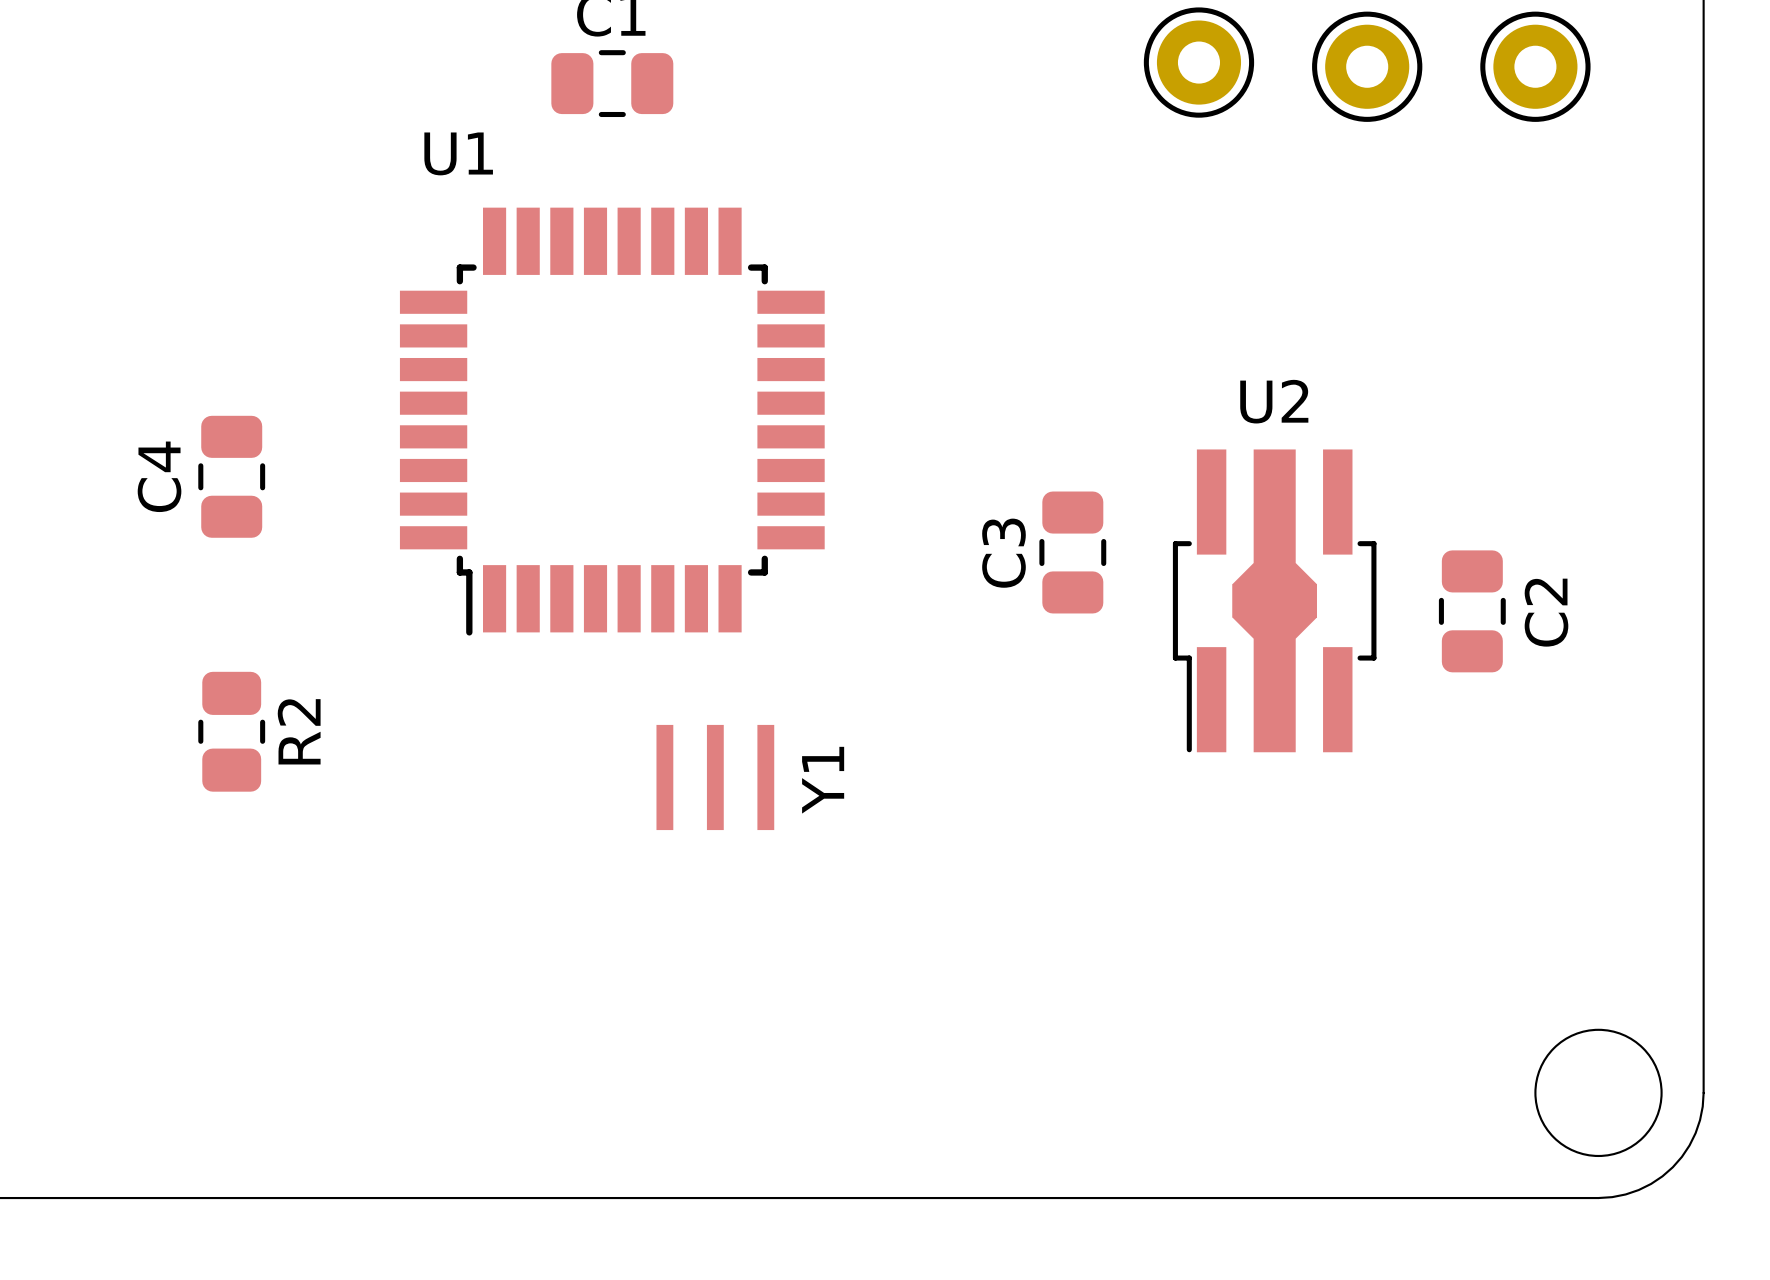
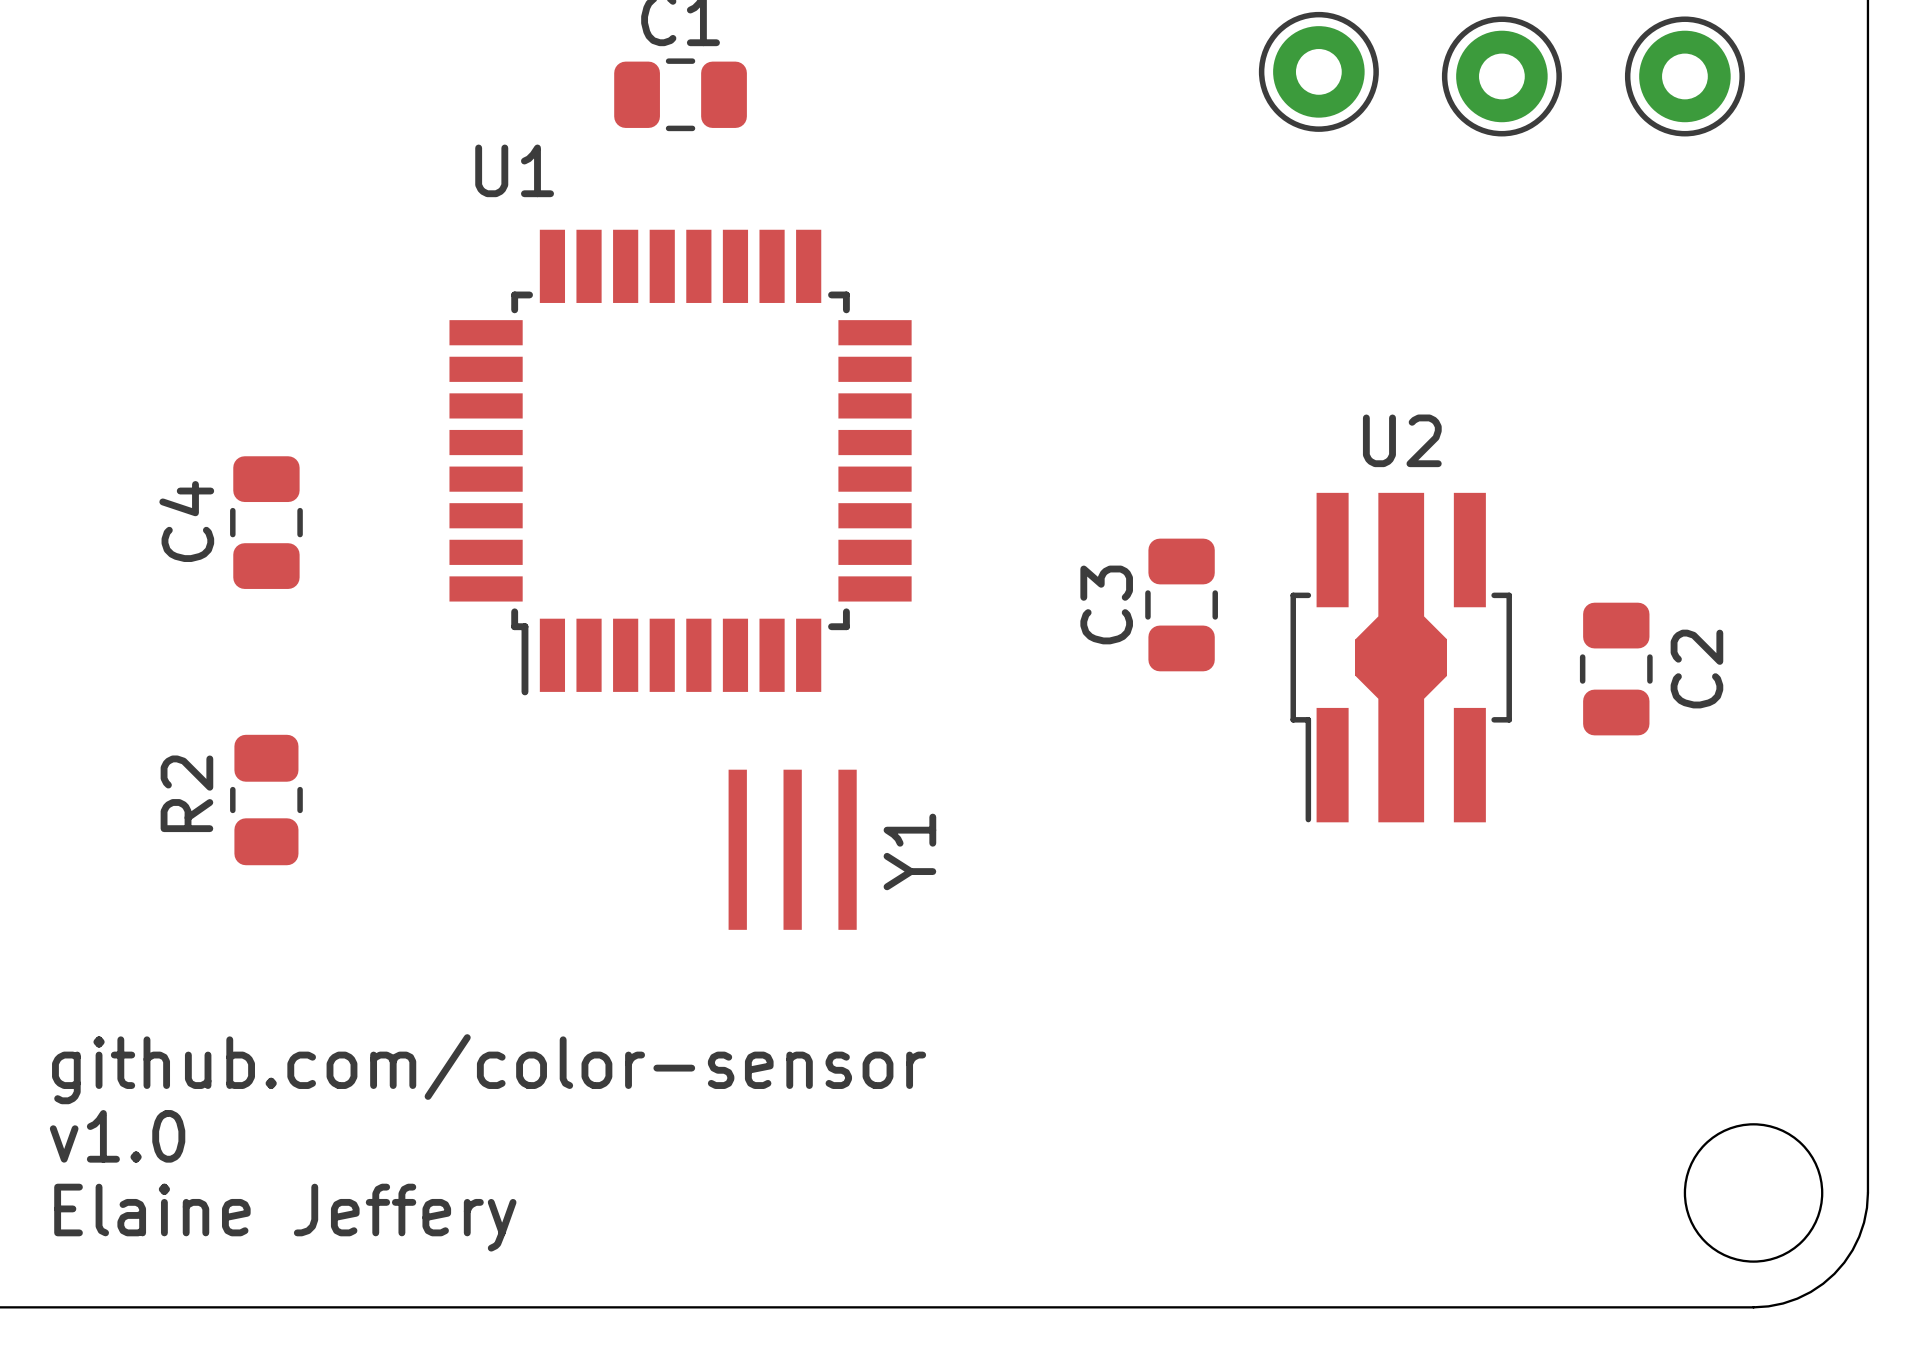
Y1 footprint: [656, 724, 775, 831] -> [728, 769, 857, 930]
R2 name position: R2 (299, 731) -> R2 (186, 793)
text: none -> github.com/color-sensor (489, 1069)
text: none -> v1.0 (117, 1136)
text: none -> Elaine Jeffery (285, 1217)

